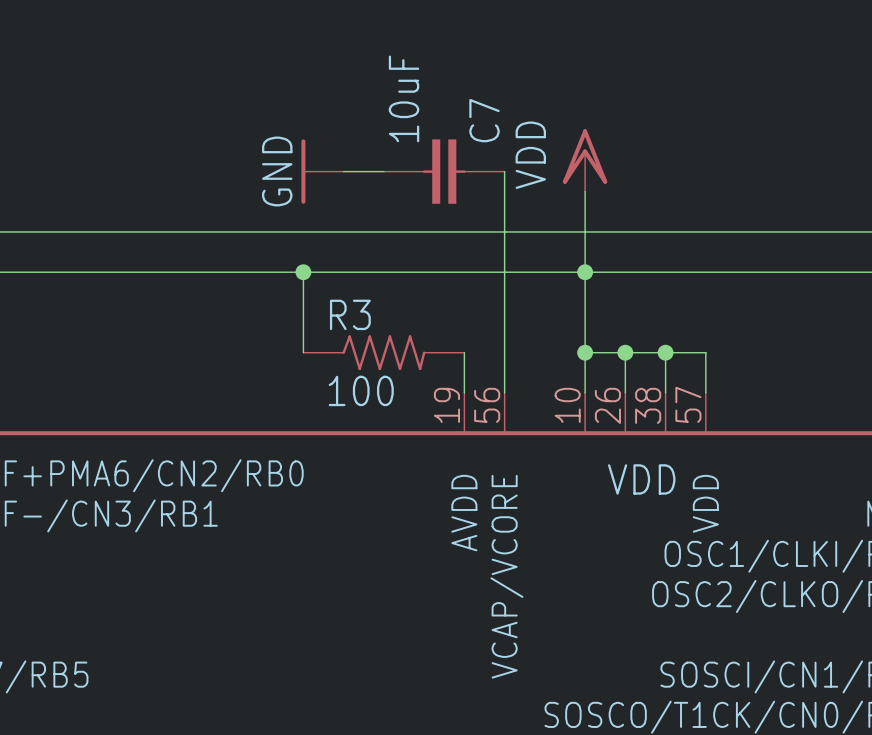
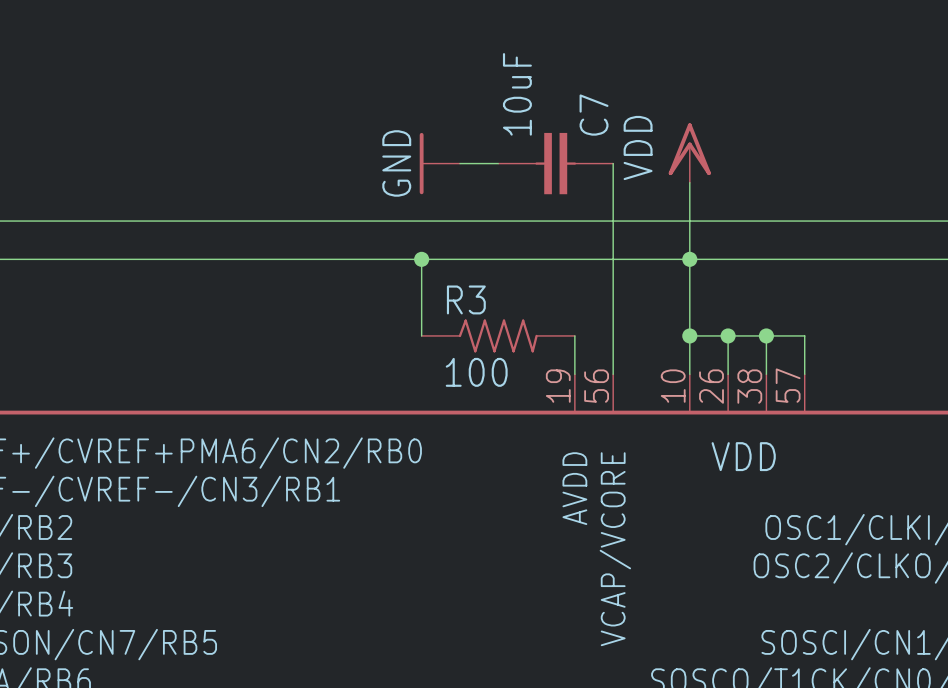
part pin name: VDD (705, 503) -> none

